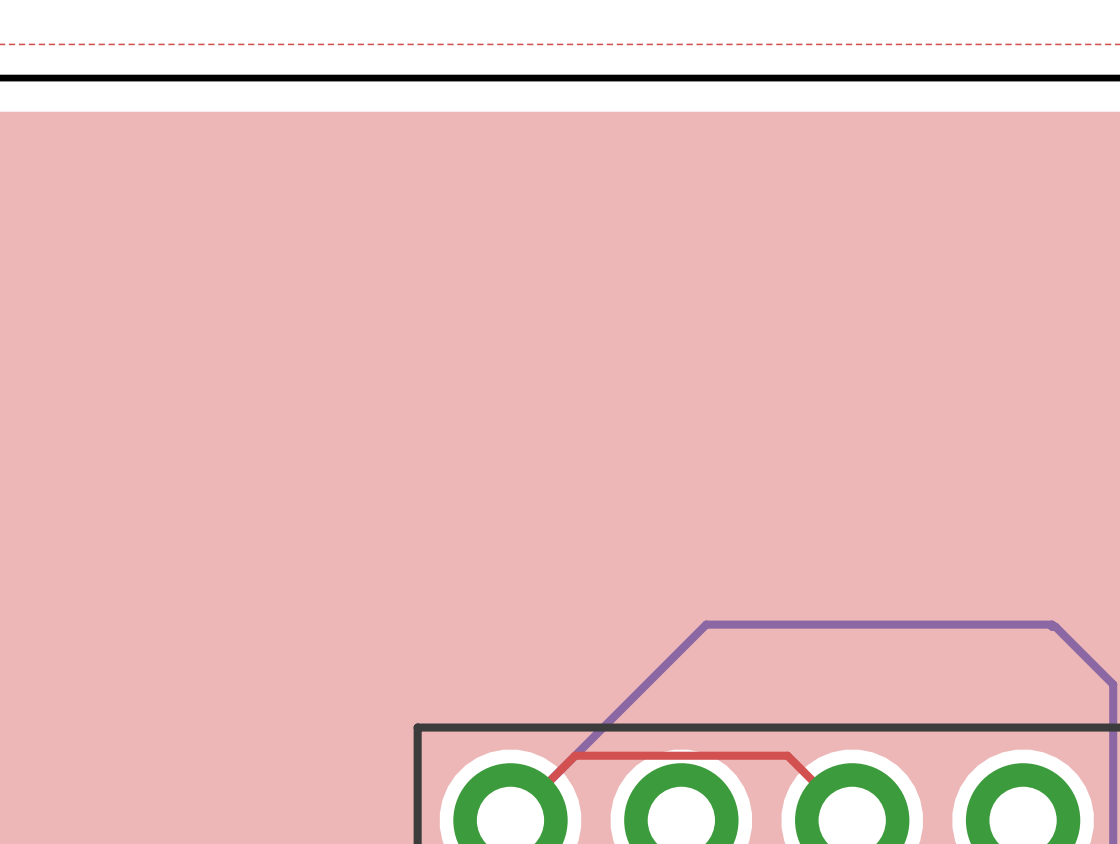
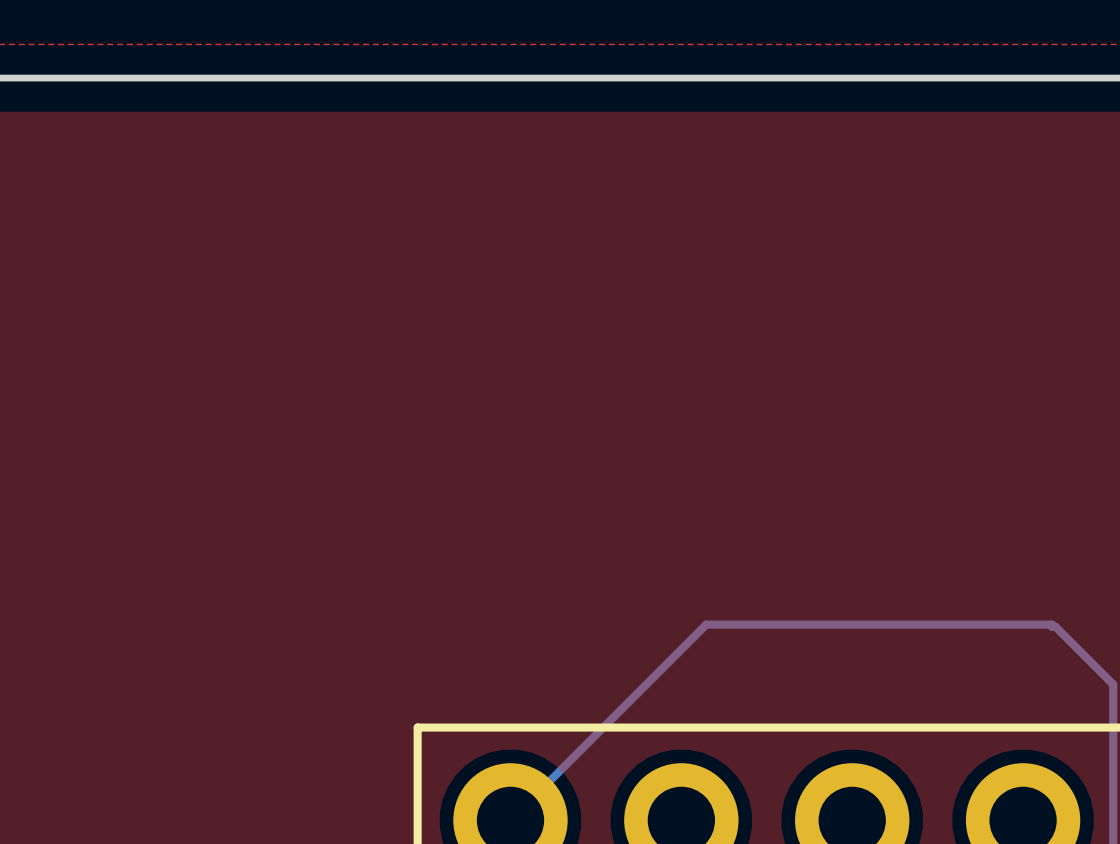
top track: (510, 820) (575, 755) (787, 755) (852, 820) -> none

